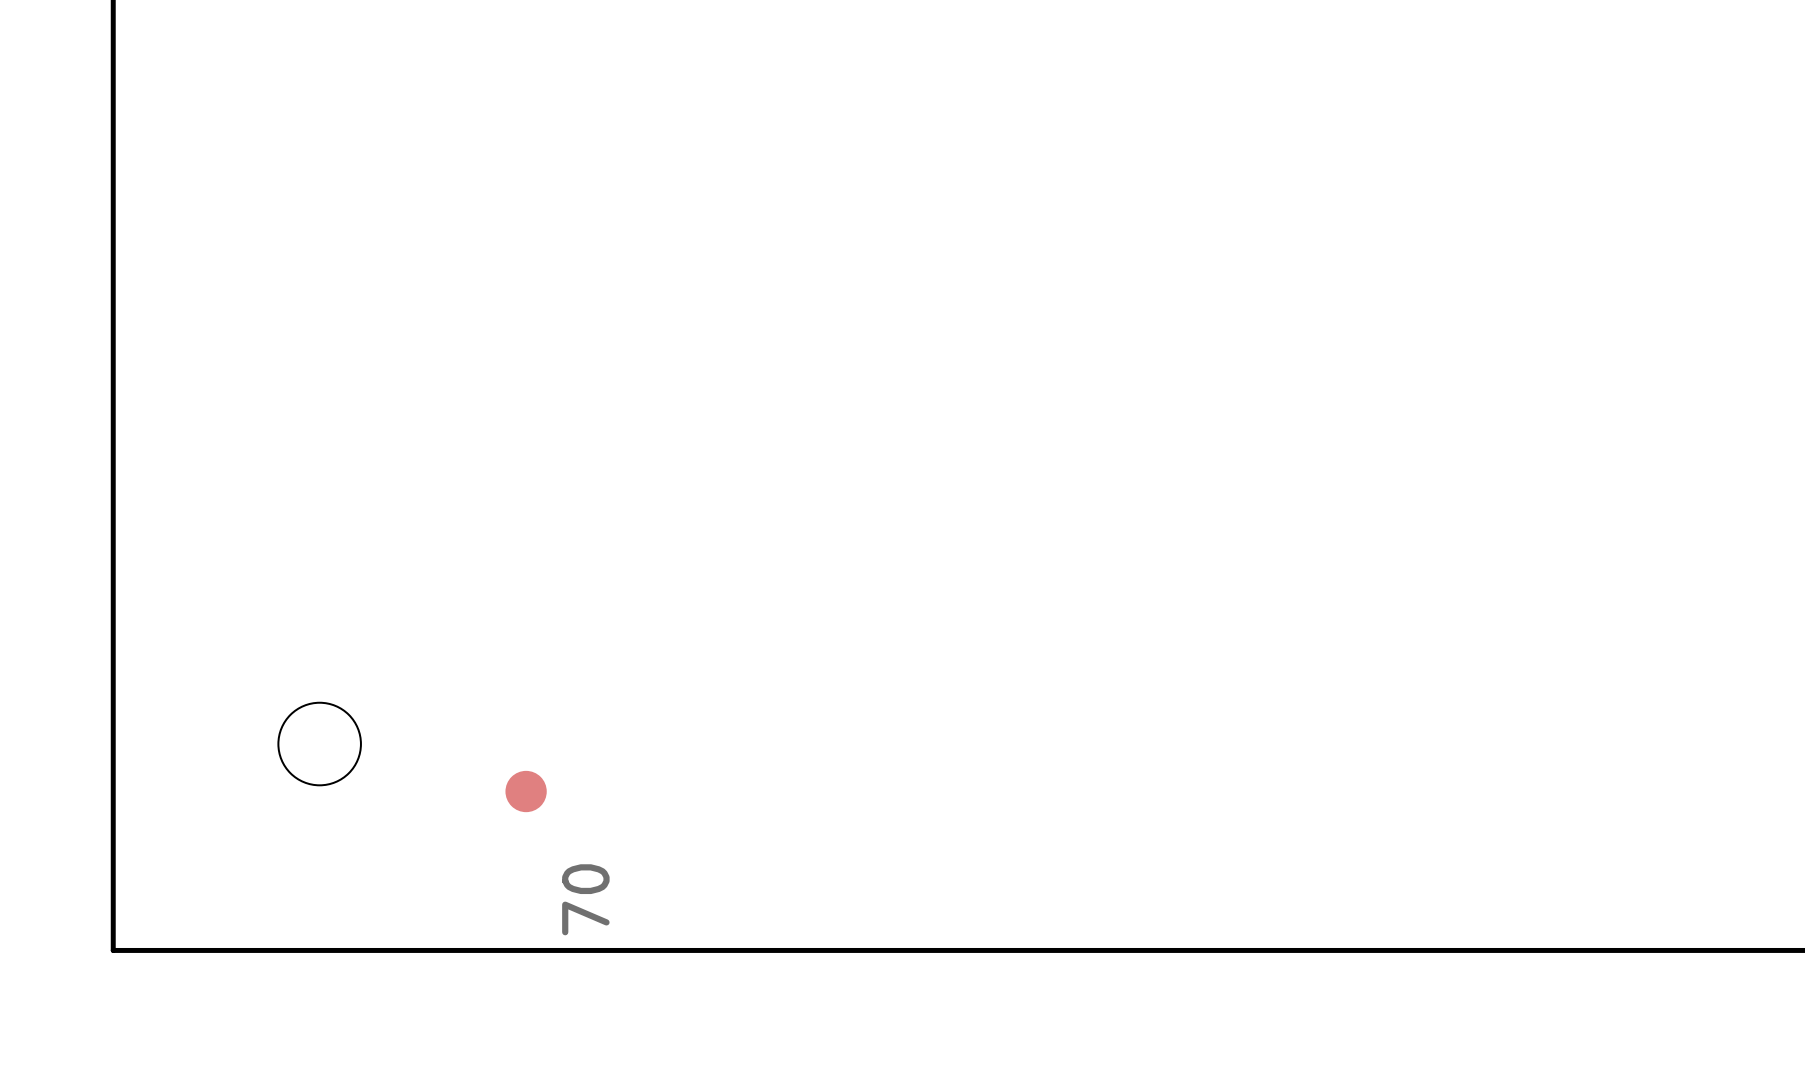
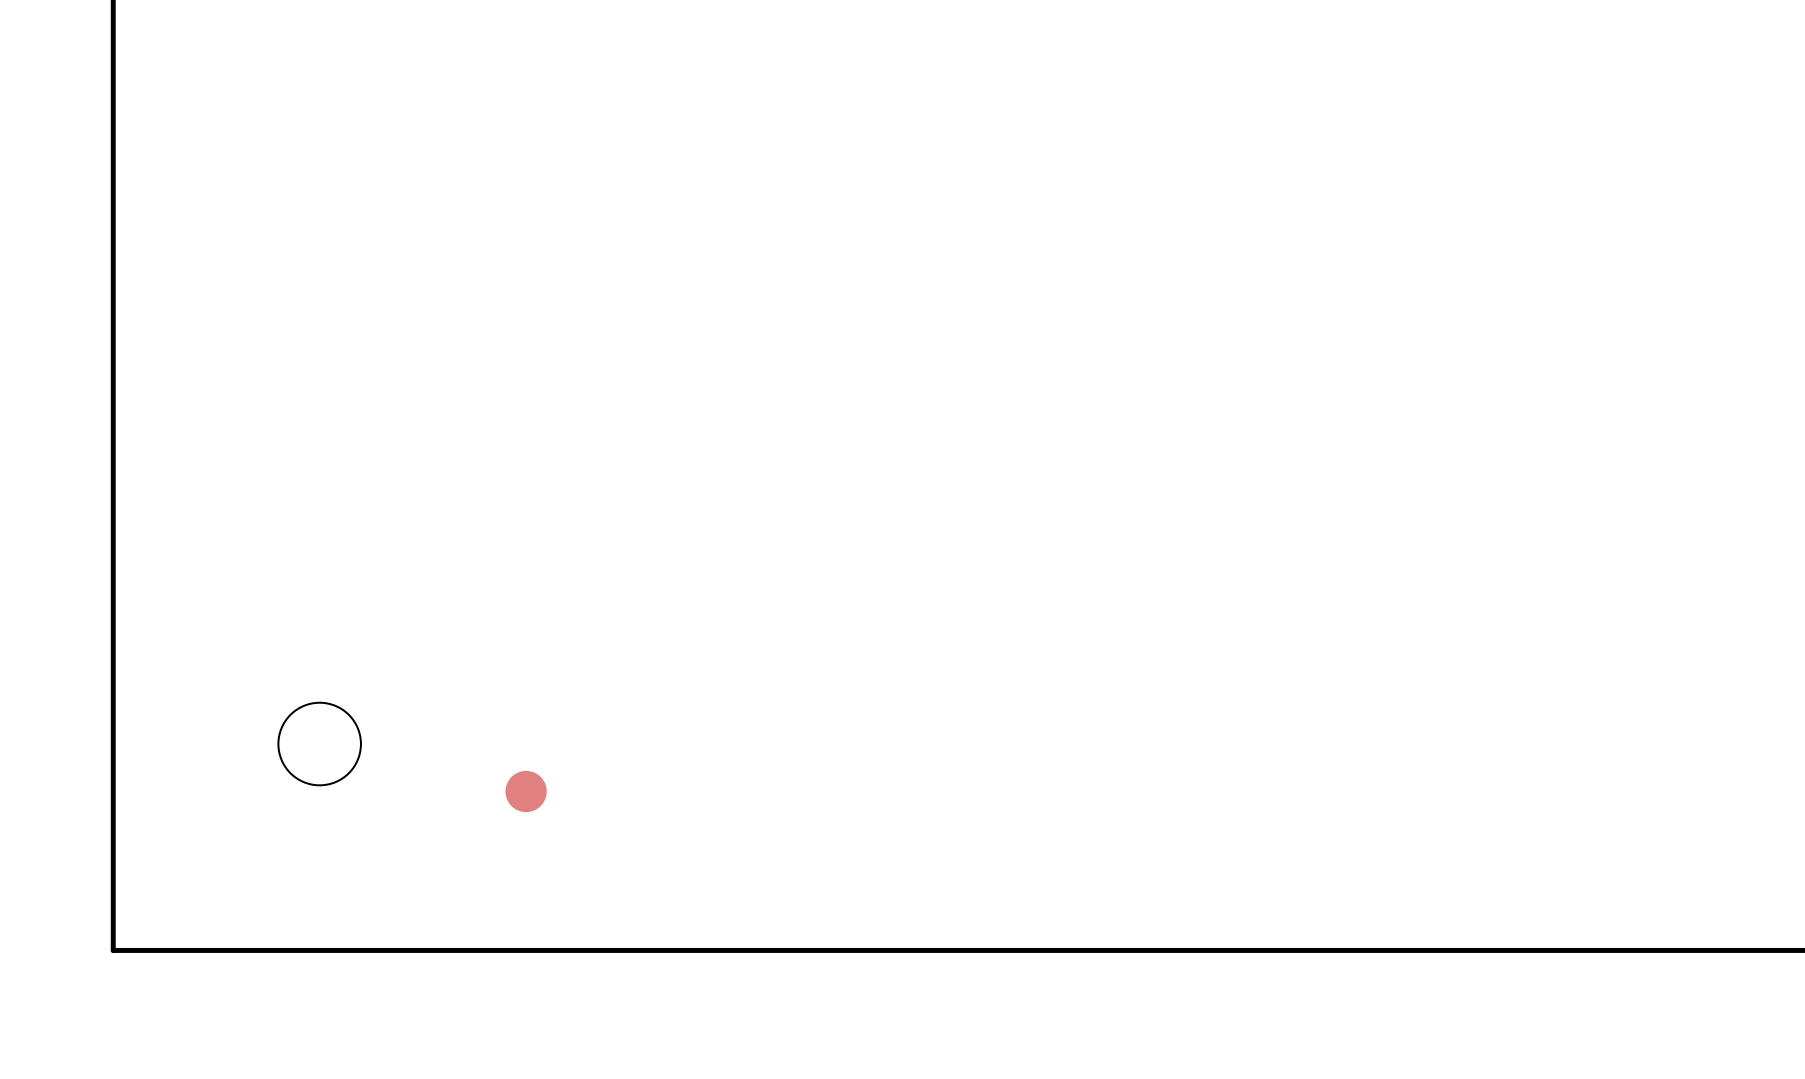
drawing: [562, 864, 610, 936] -> none

